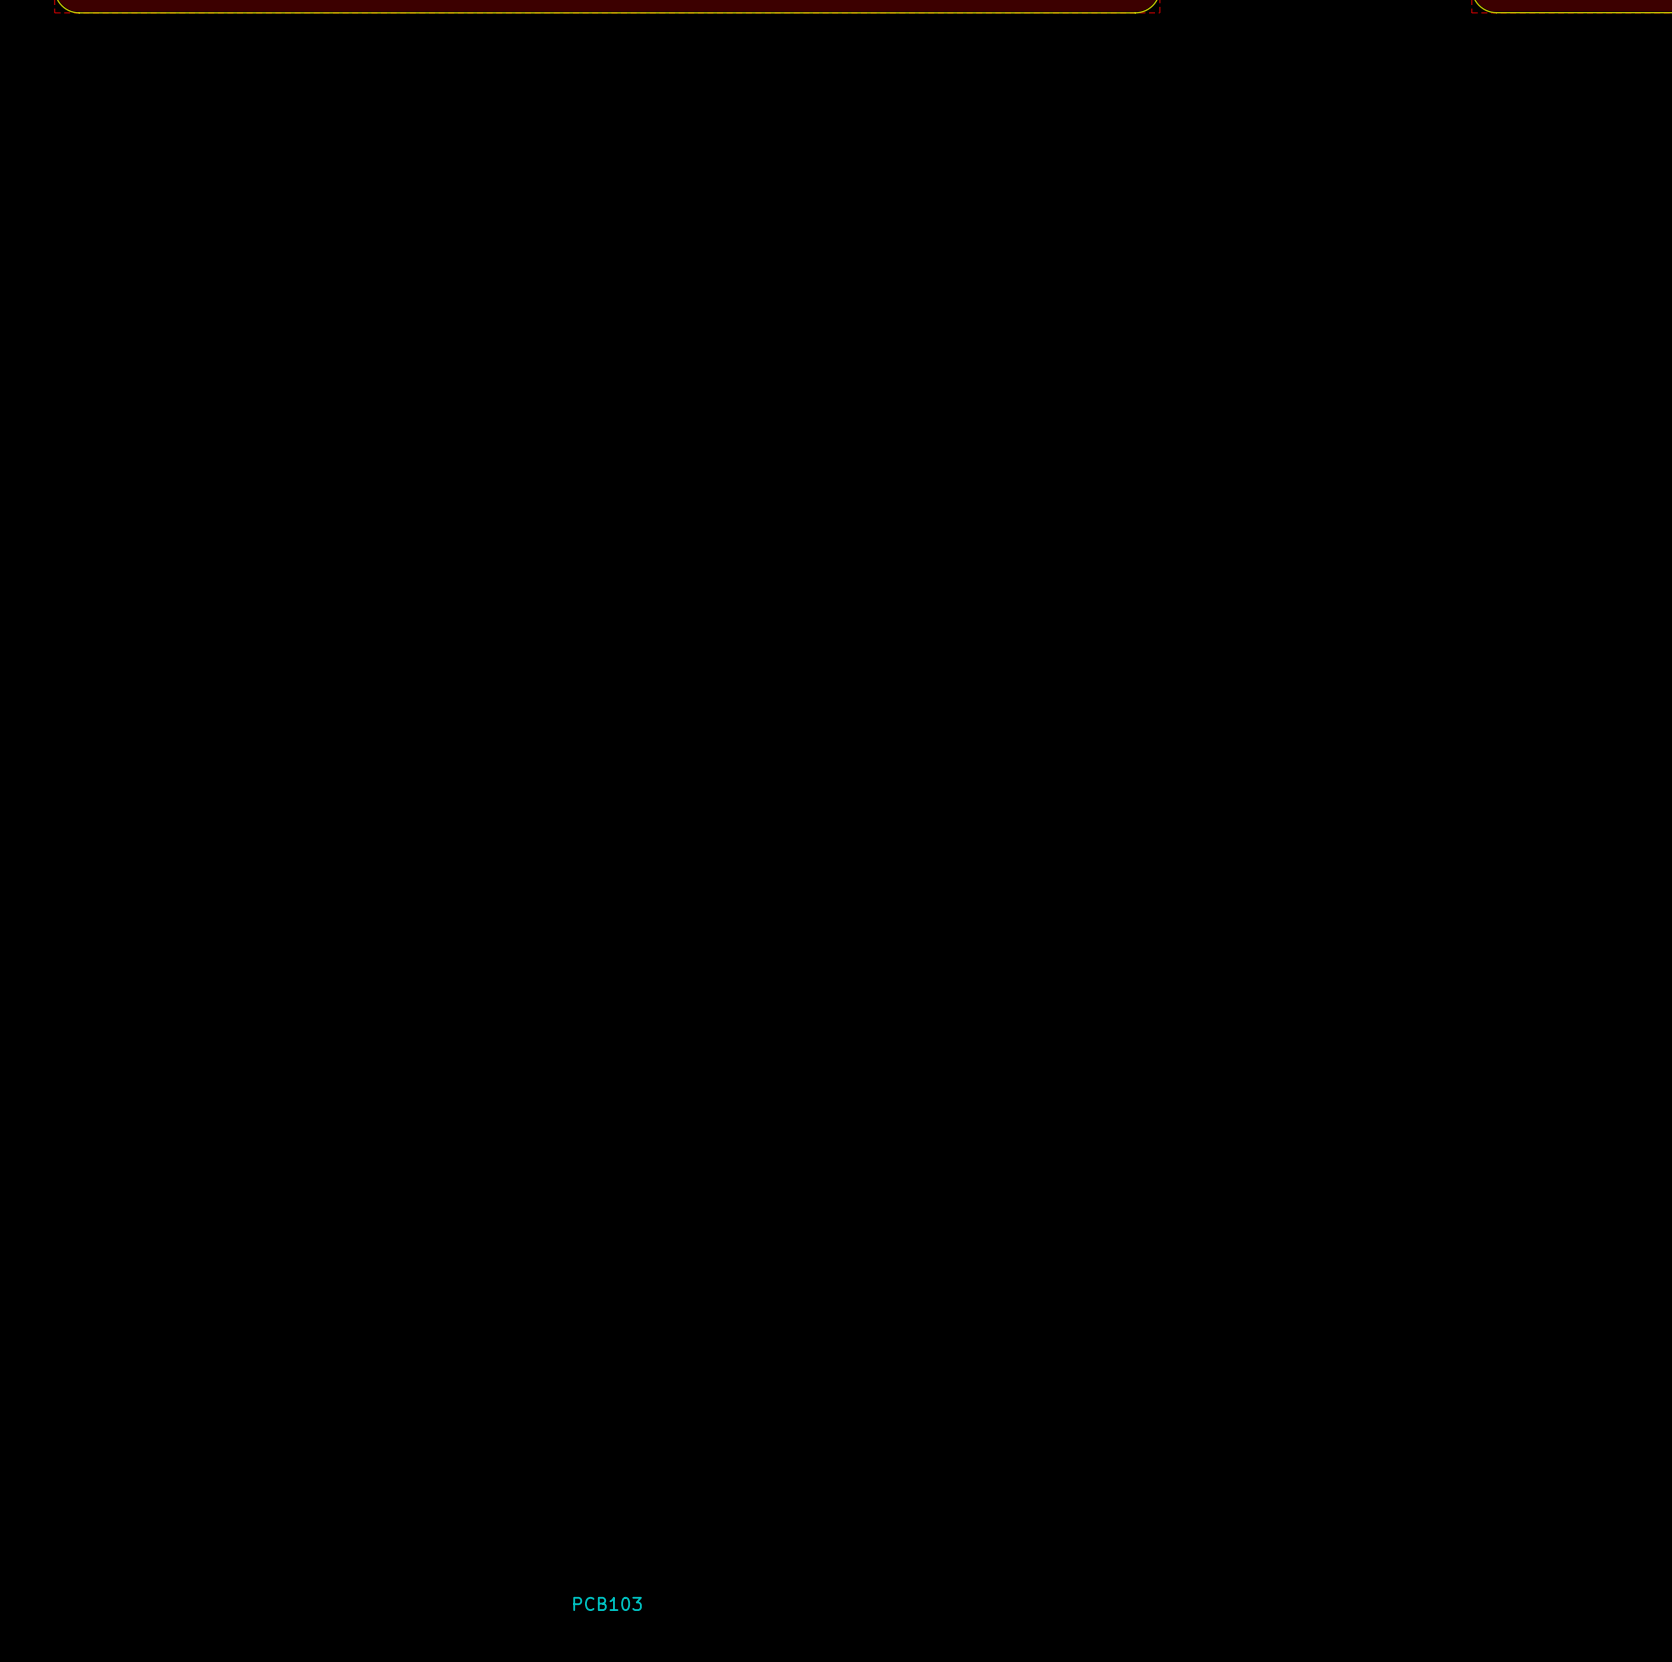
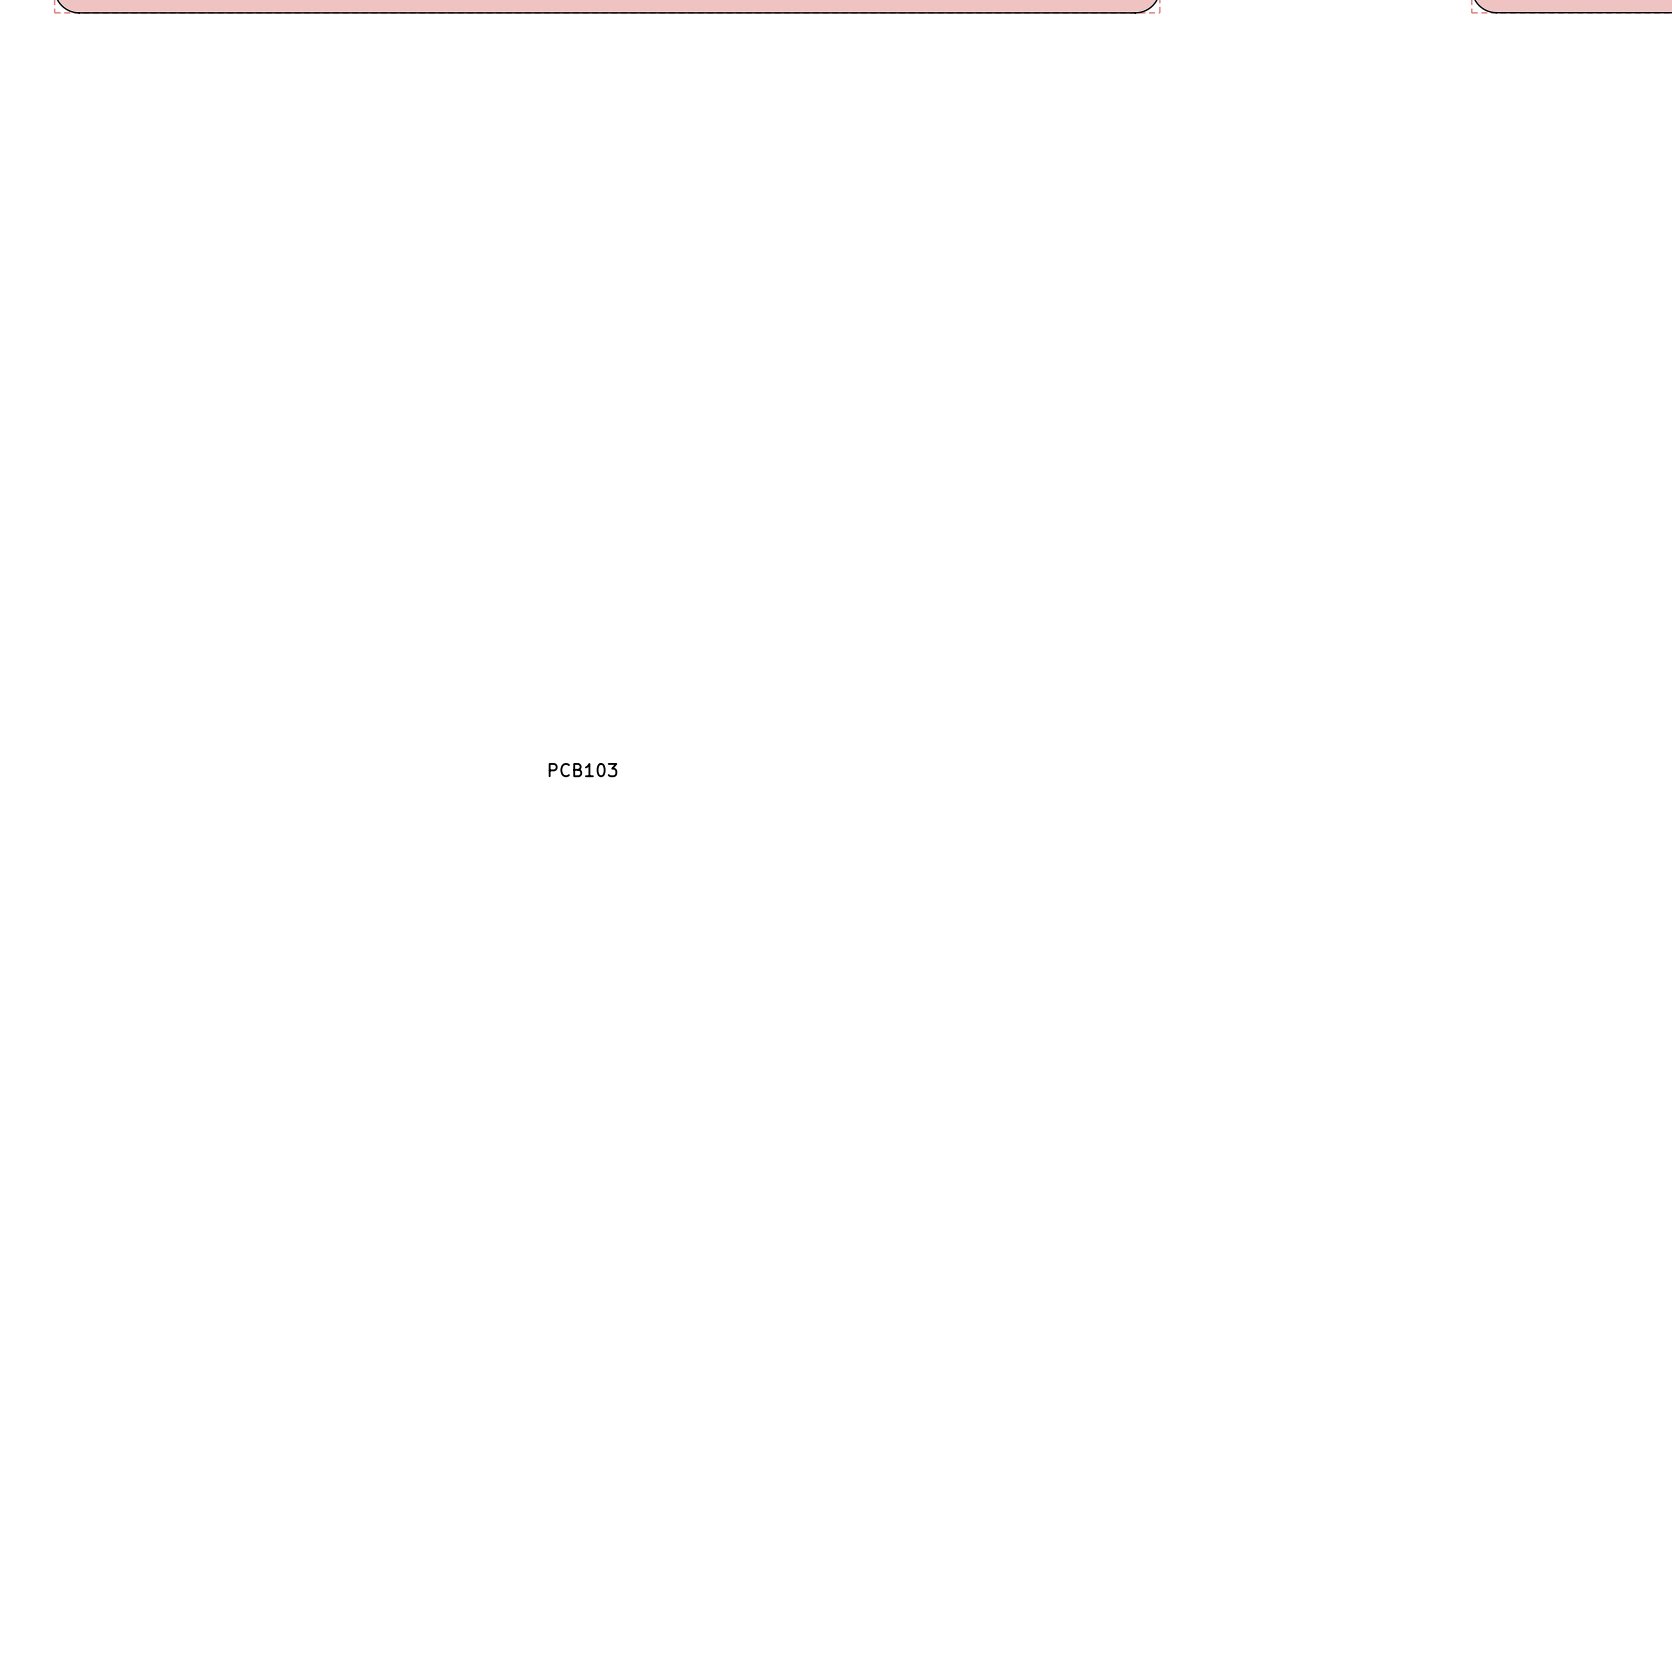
PCB103 position: (607, 1603) -> (582, 770)

